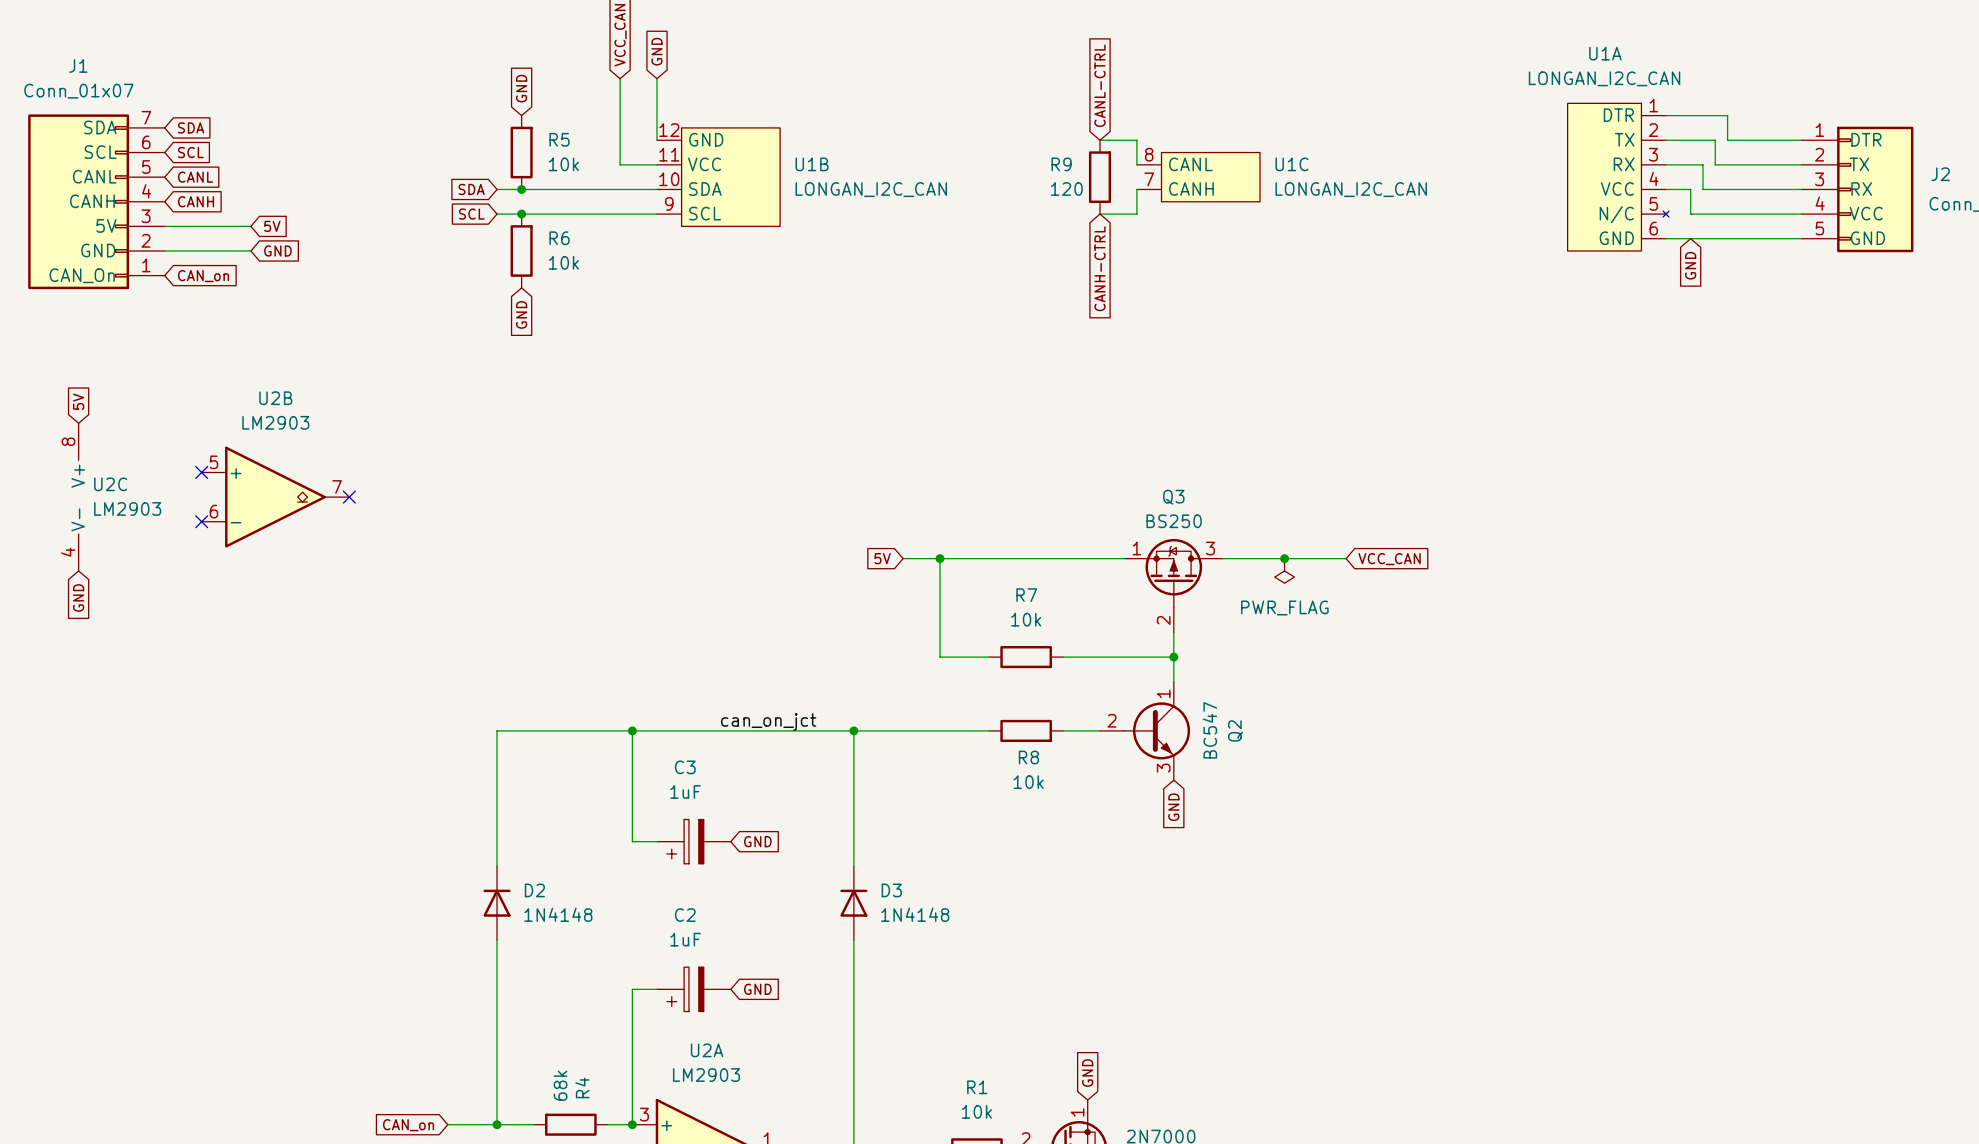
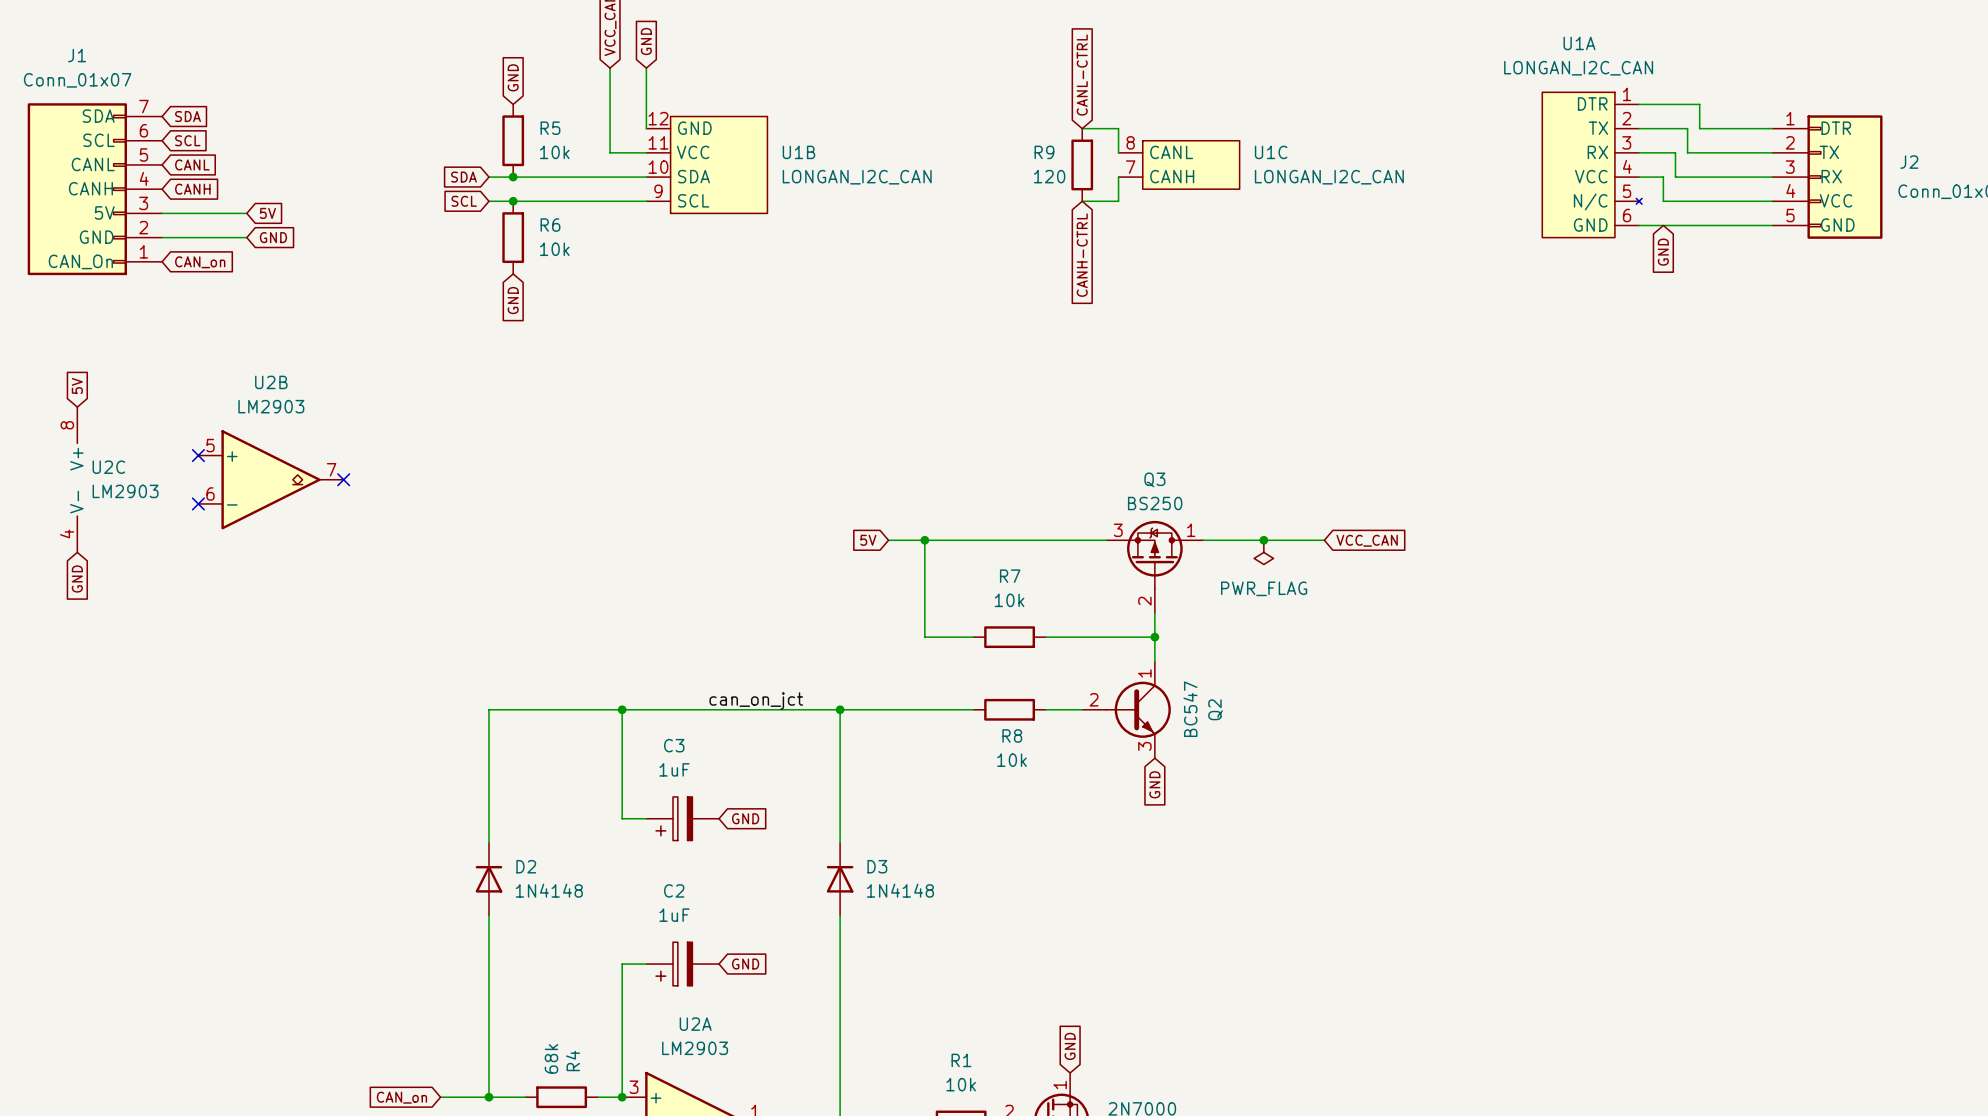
Q3 pin number: 1 (1136, 548) -> 3 (1118, 530)
Q3 pin number: 3 (1210, 548) -> 1 (1191, 530)

